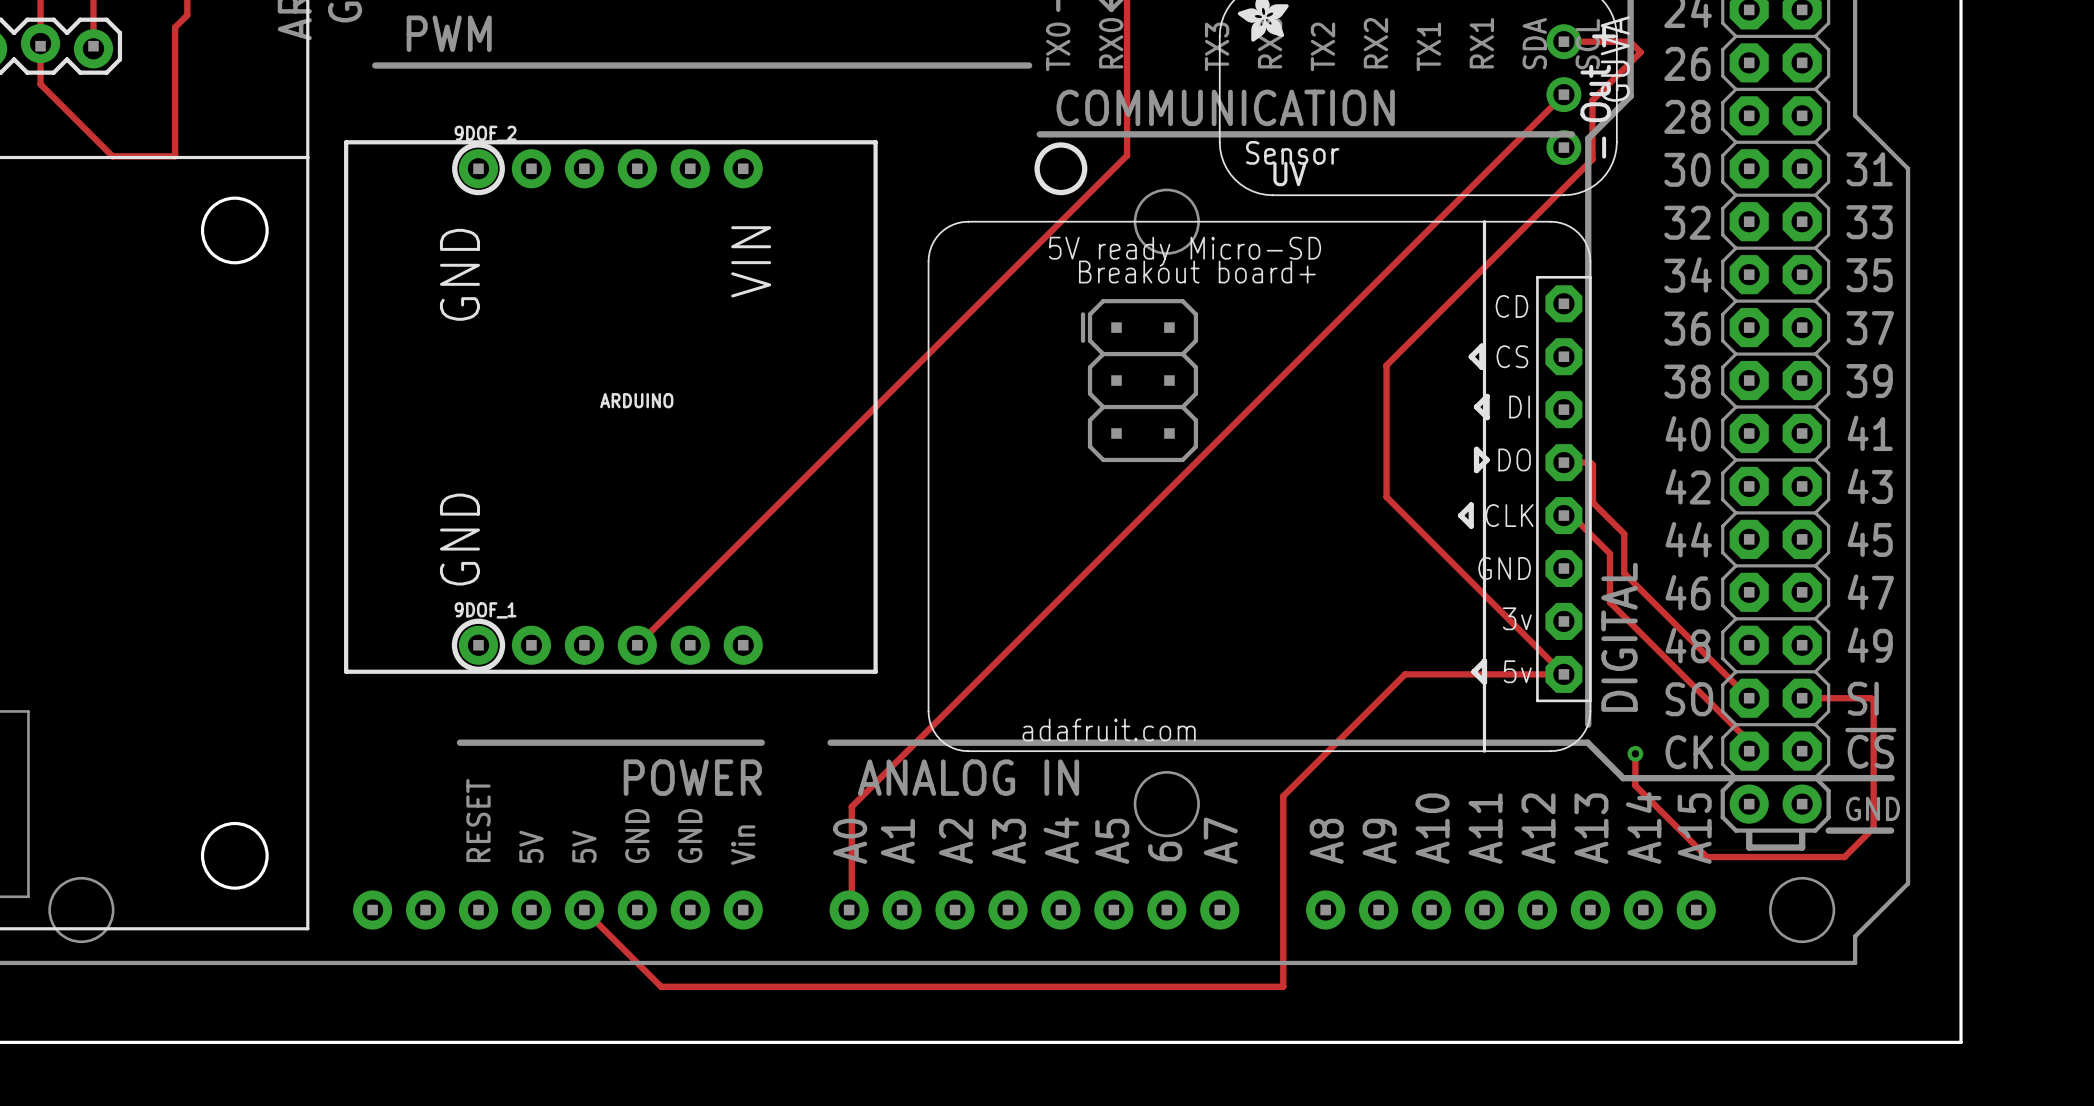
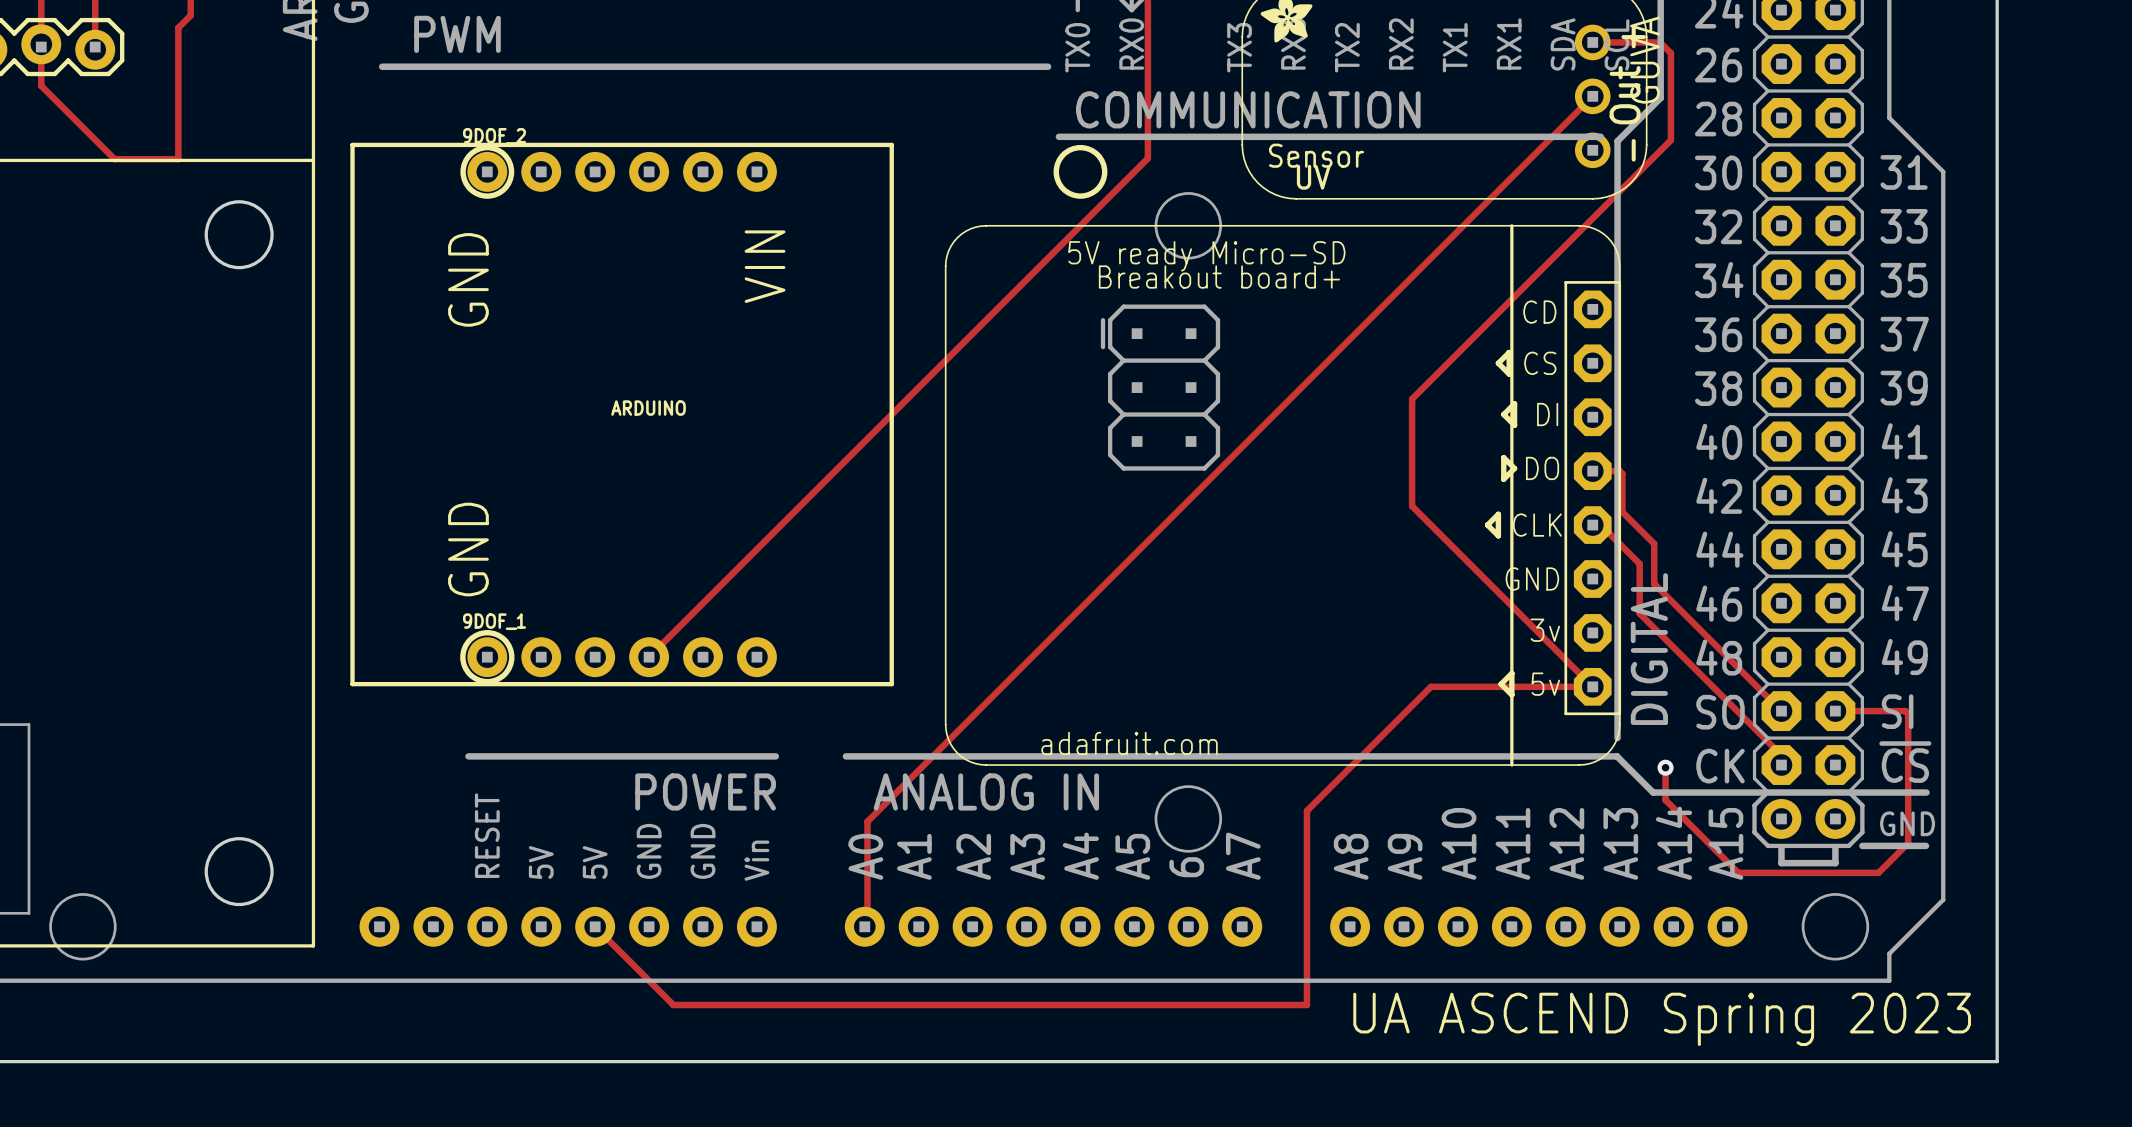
track: (1640, 52) (1592, 100) (1592, 159) (1386, 365) (1386, 391) -> (1670, 53) (1670, 140) (1412, 399)
text: none -> UA ASCEND Spring 2023 (1662, 1019)

